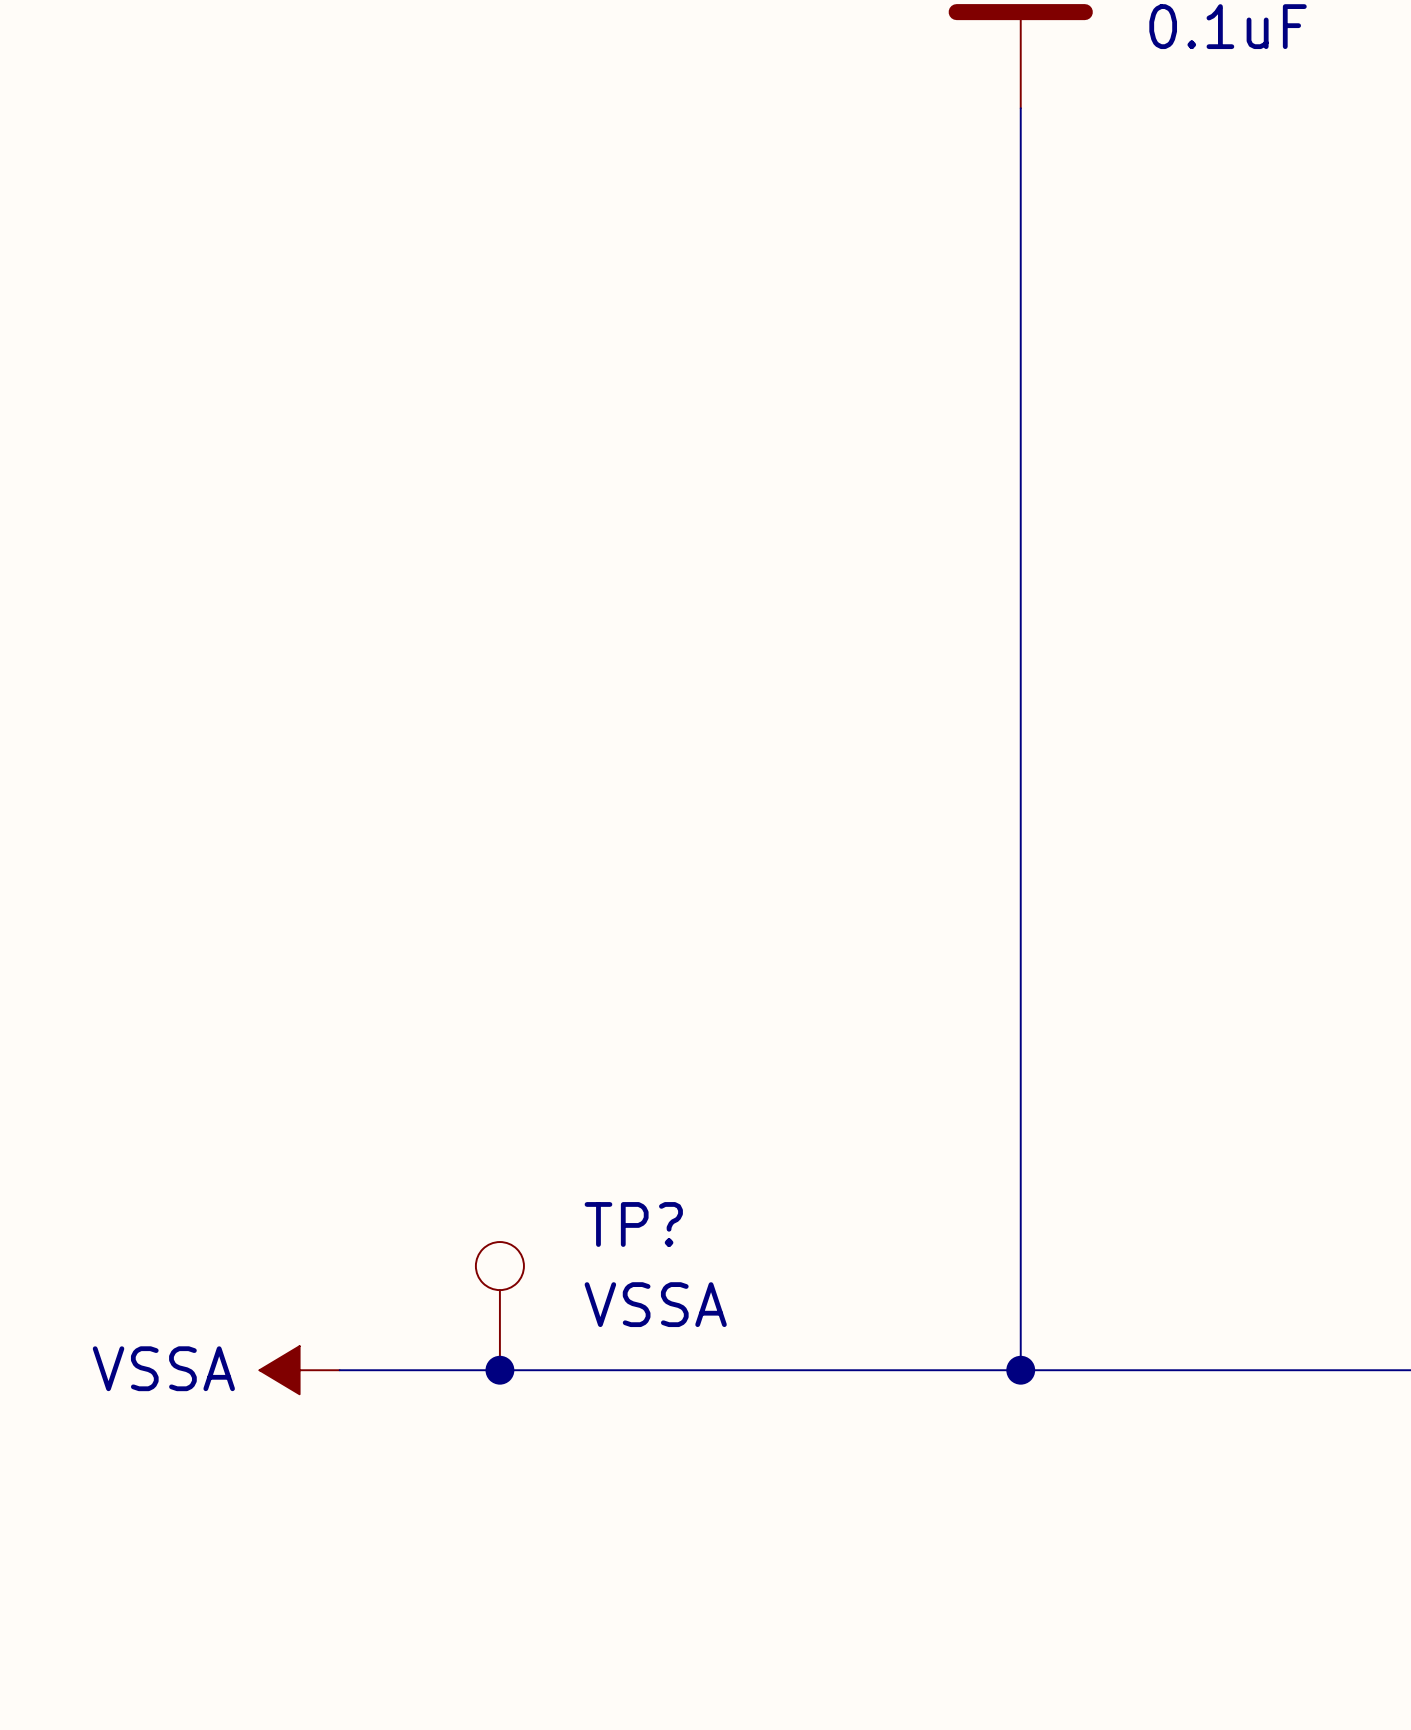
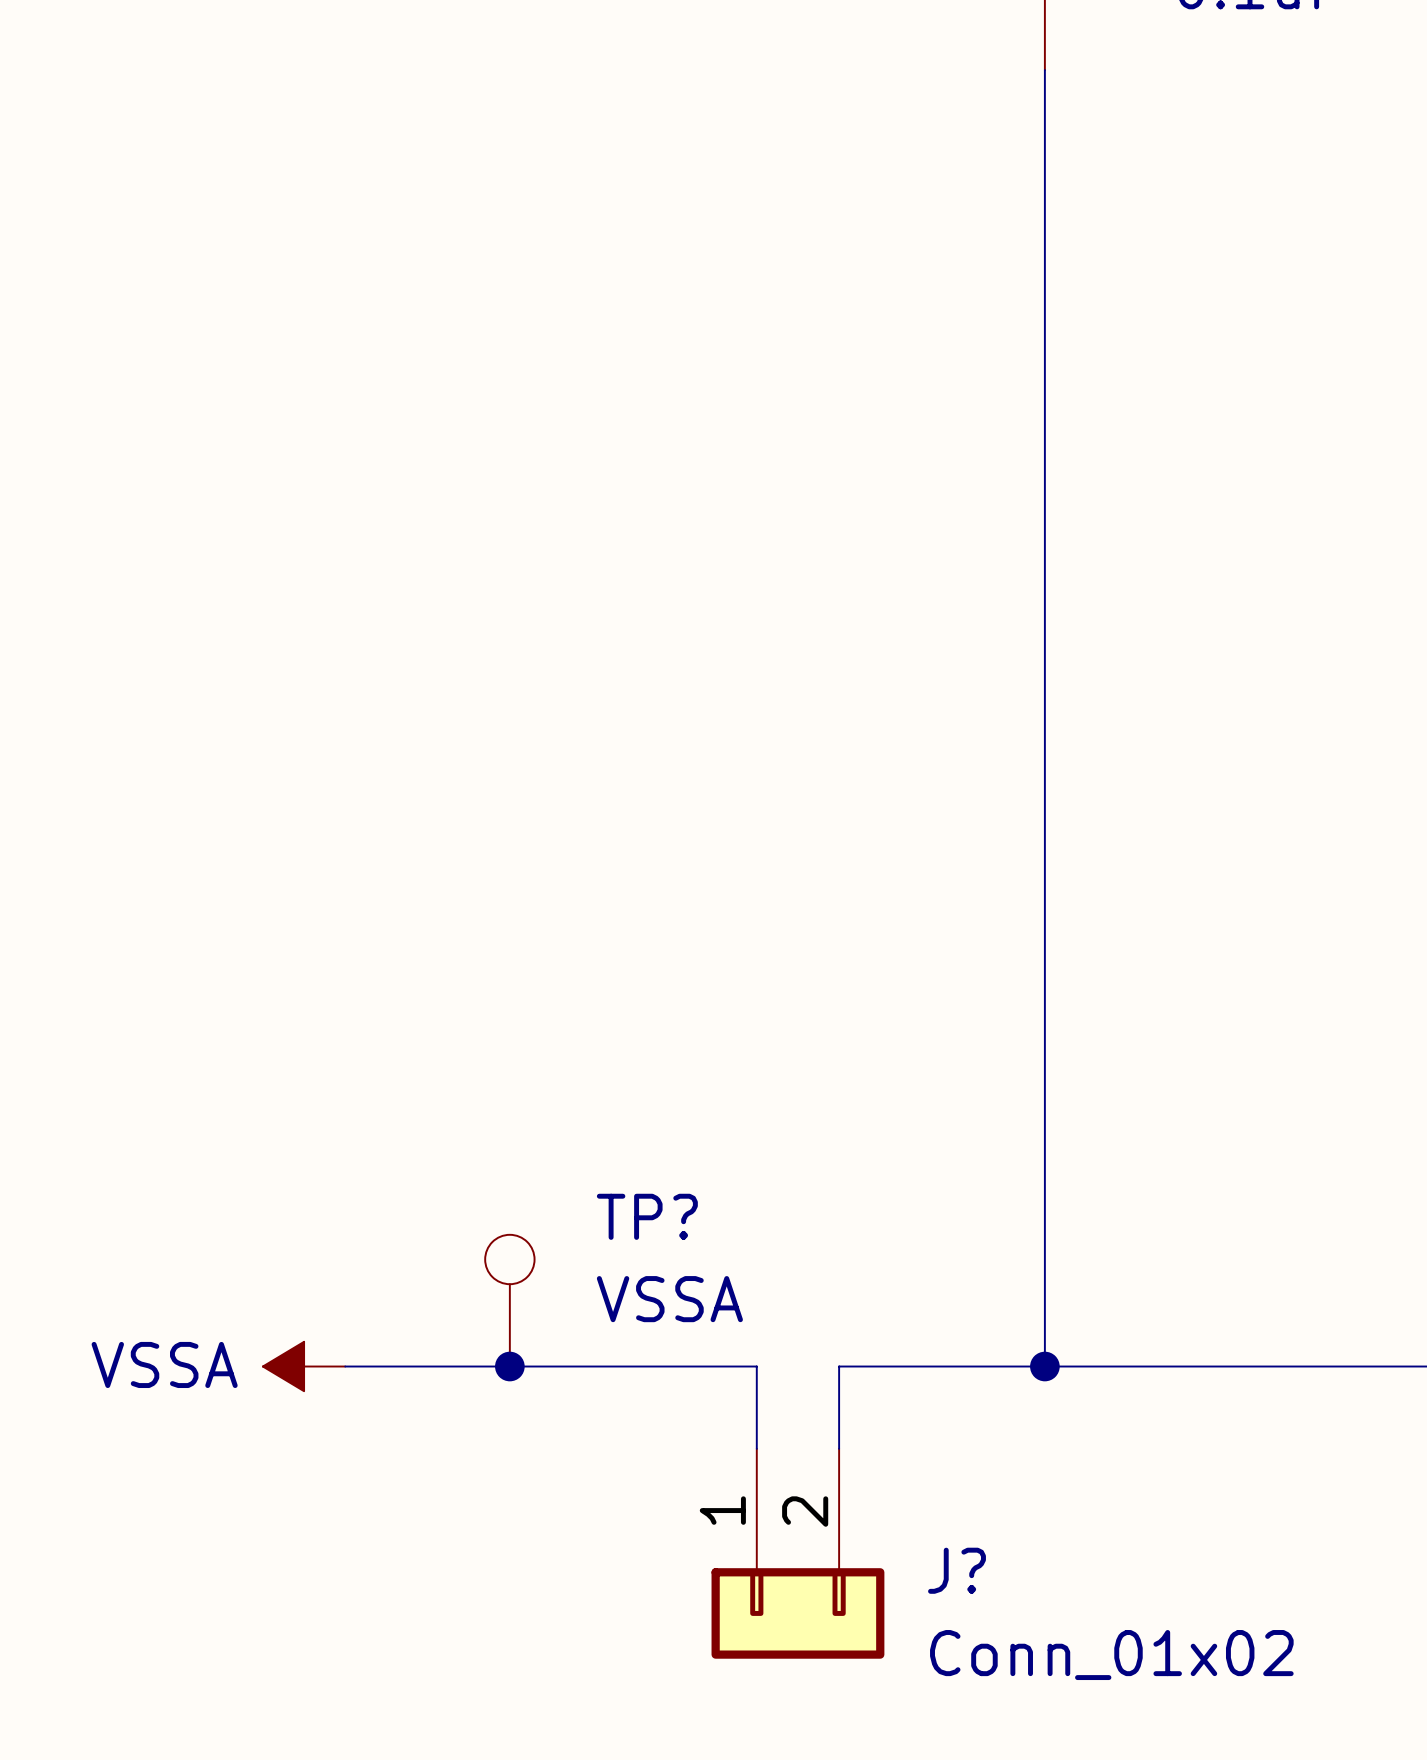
wire: (740, 1370) (820, 1370) -> (756, 1366) (756, 1448)
wire: none -> (839, 1366) (839, 1448)
J?: none -> Conn_01x02 (797, 1553)

